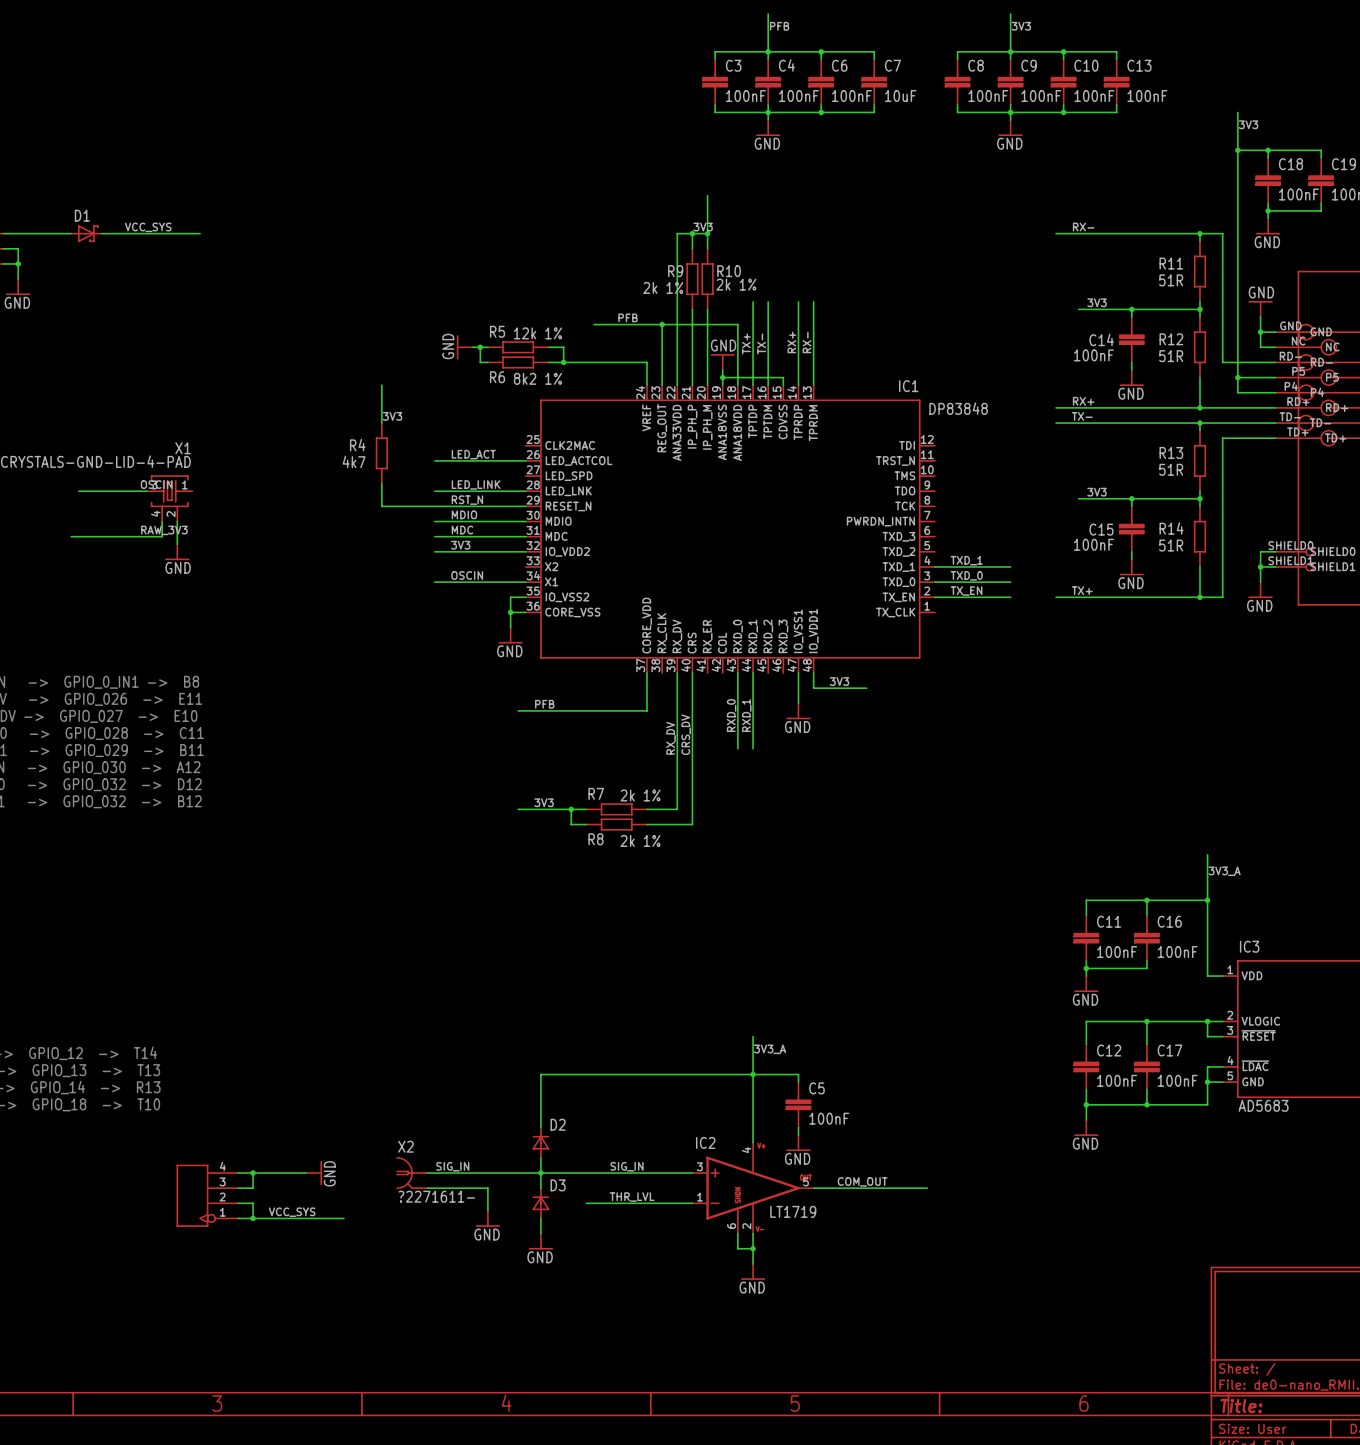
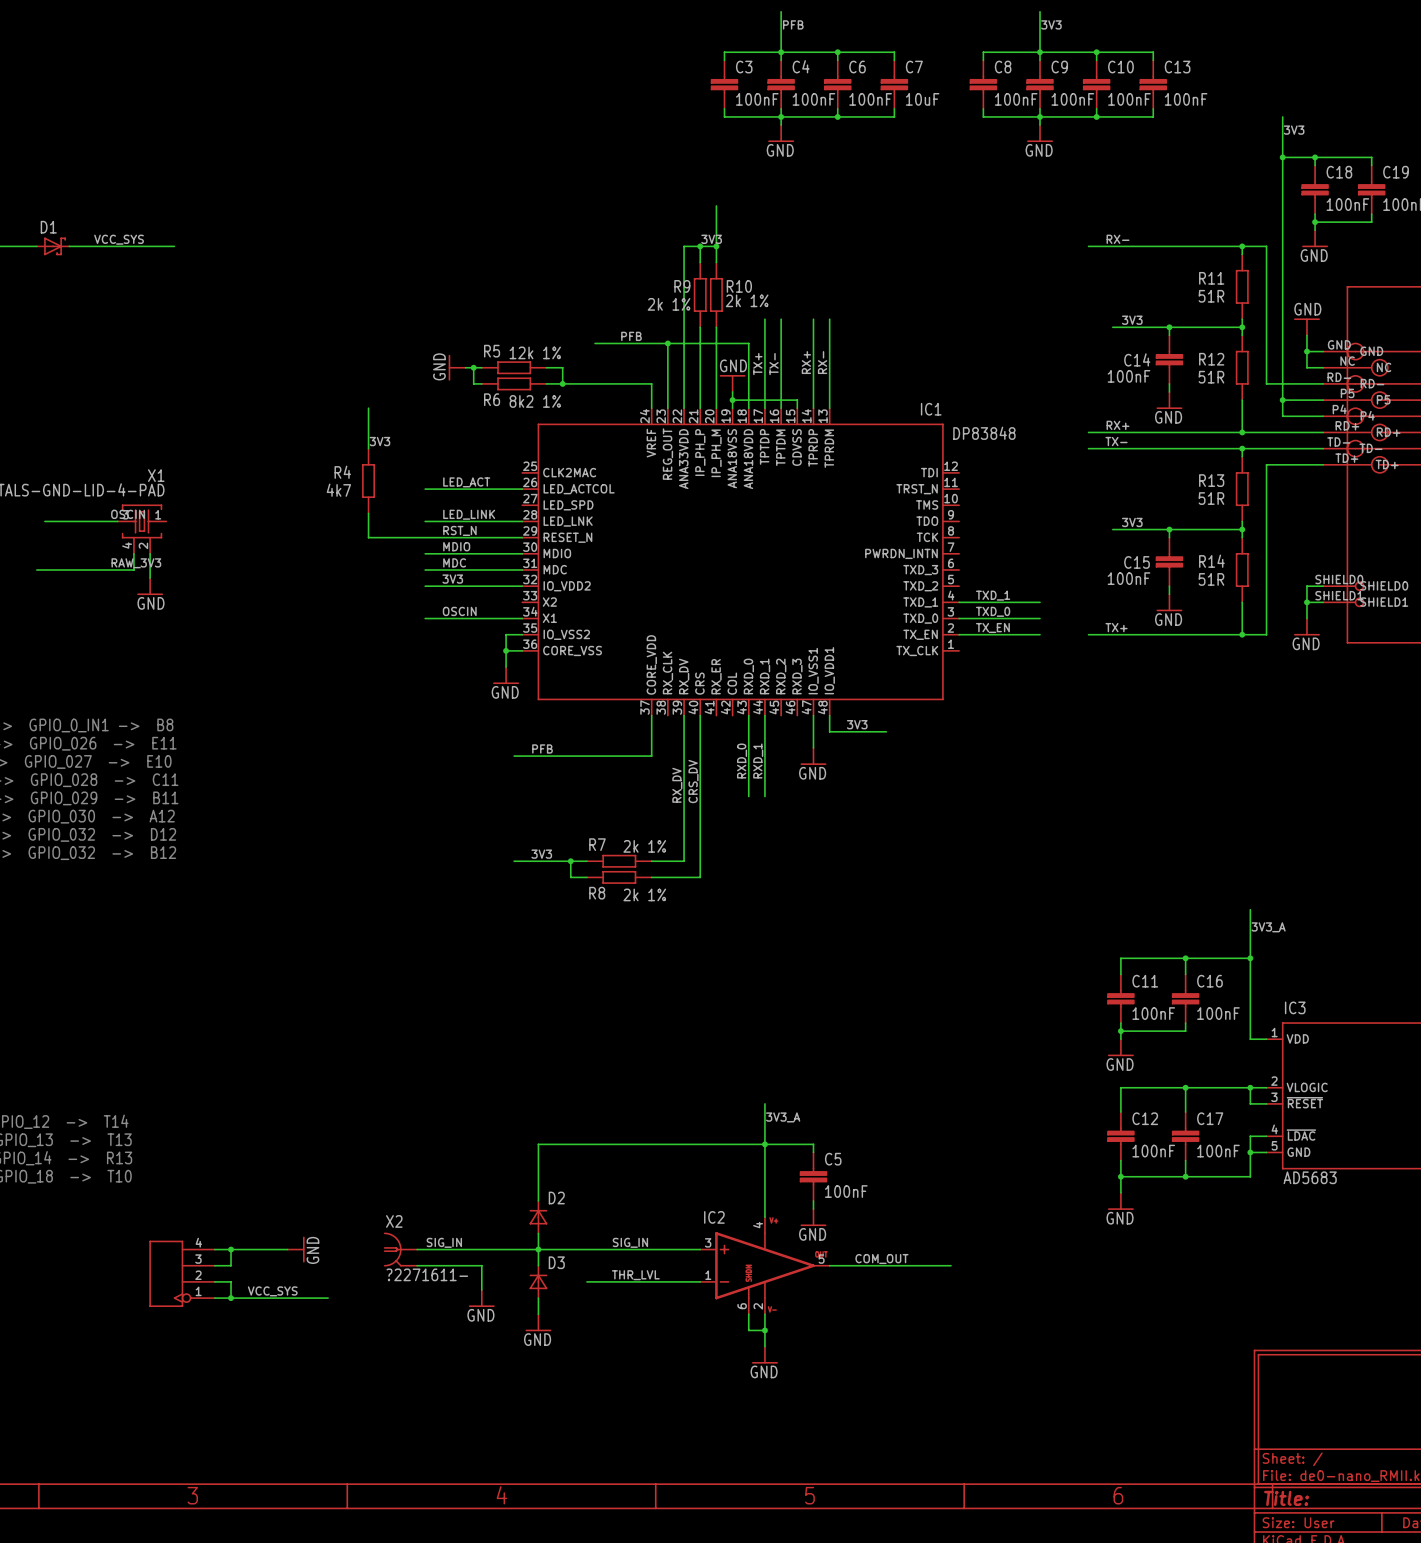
IC2 value: LT1719 (793, 1211) -> none

